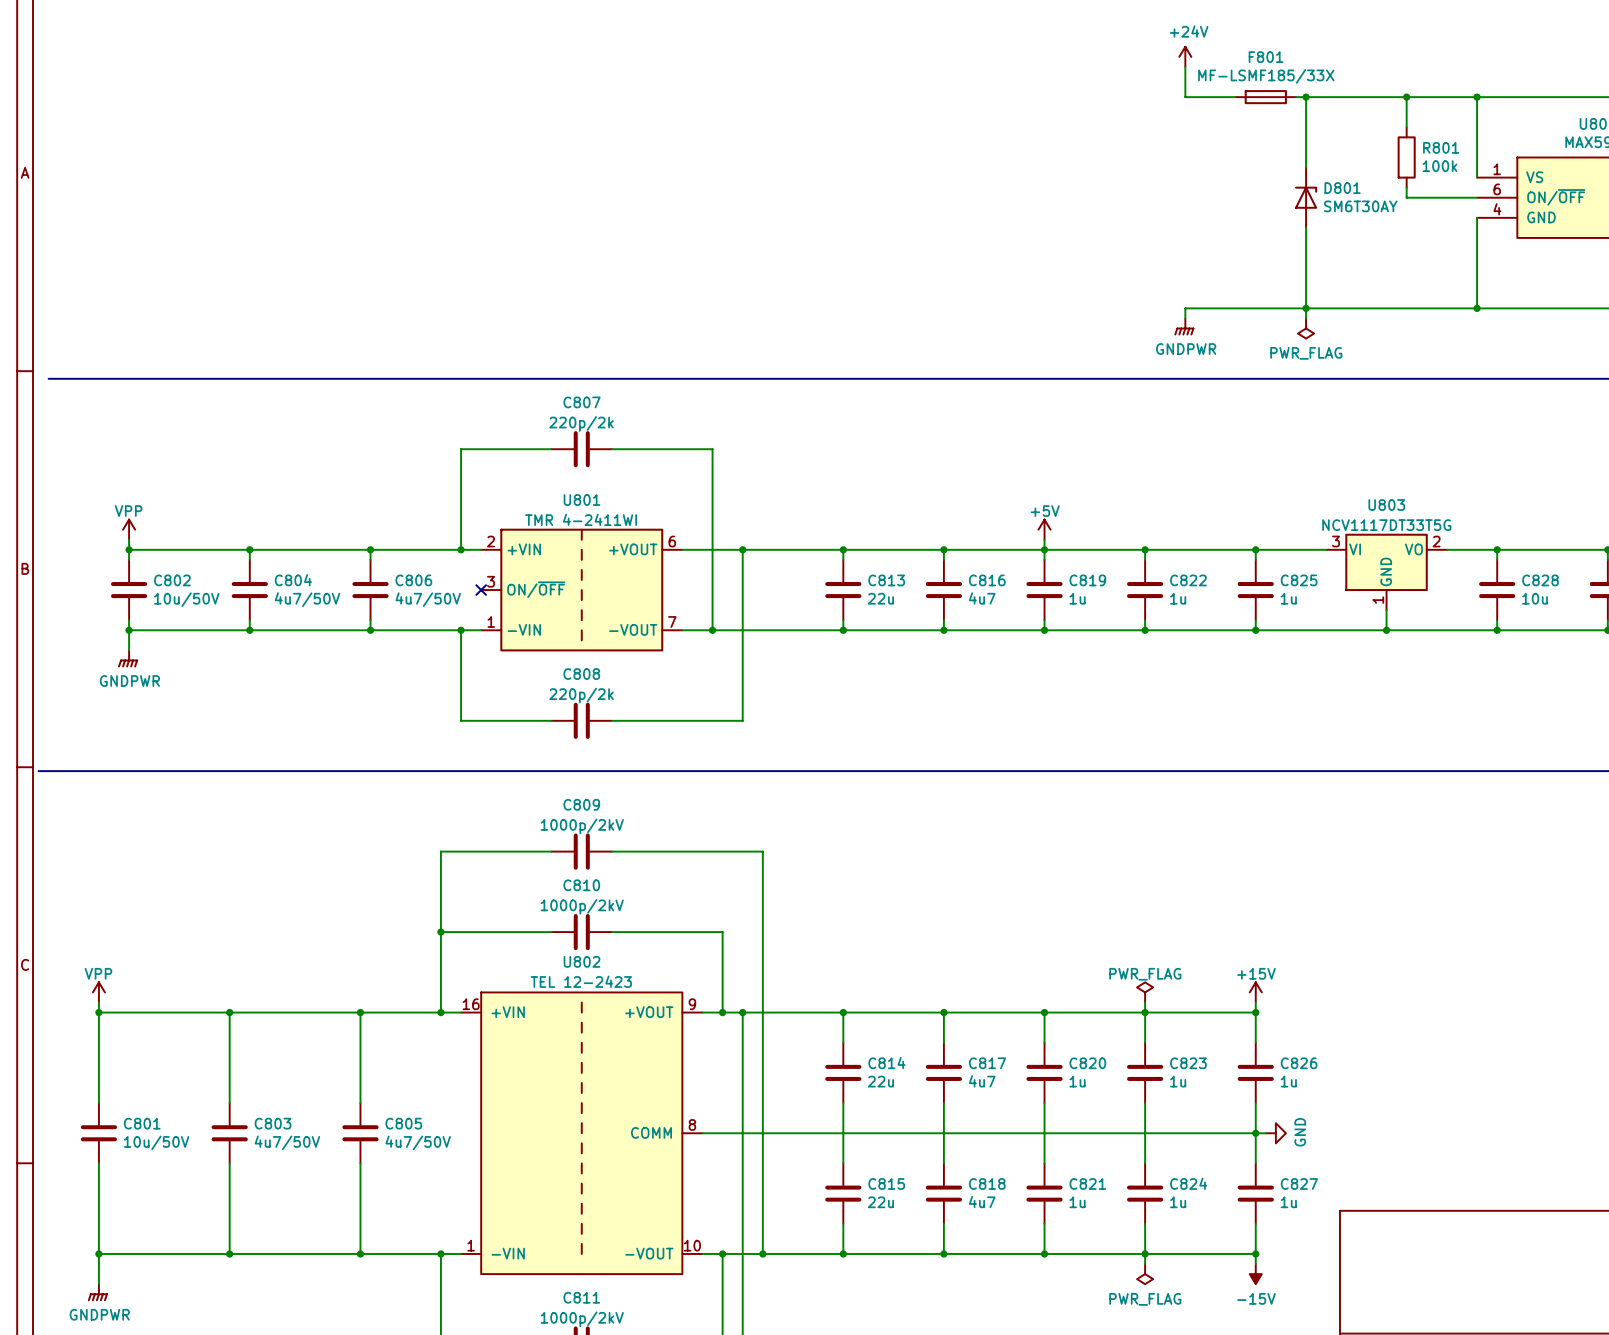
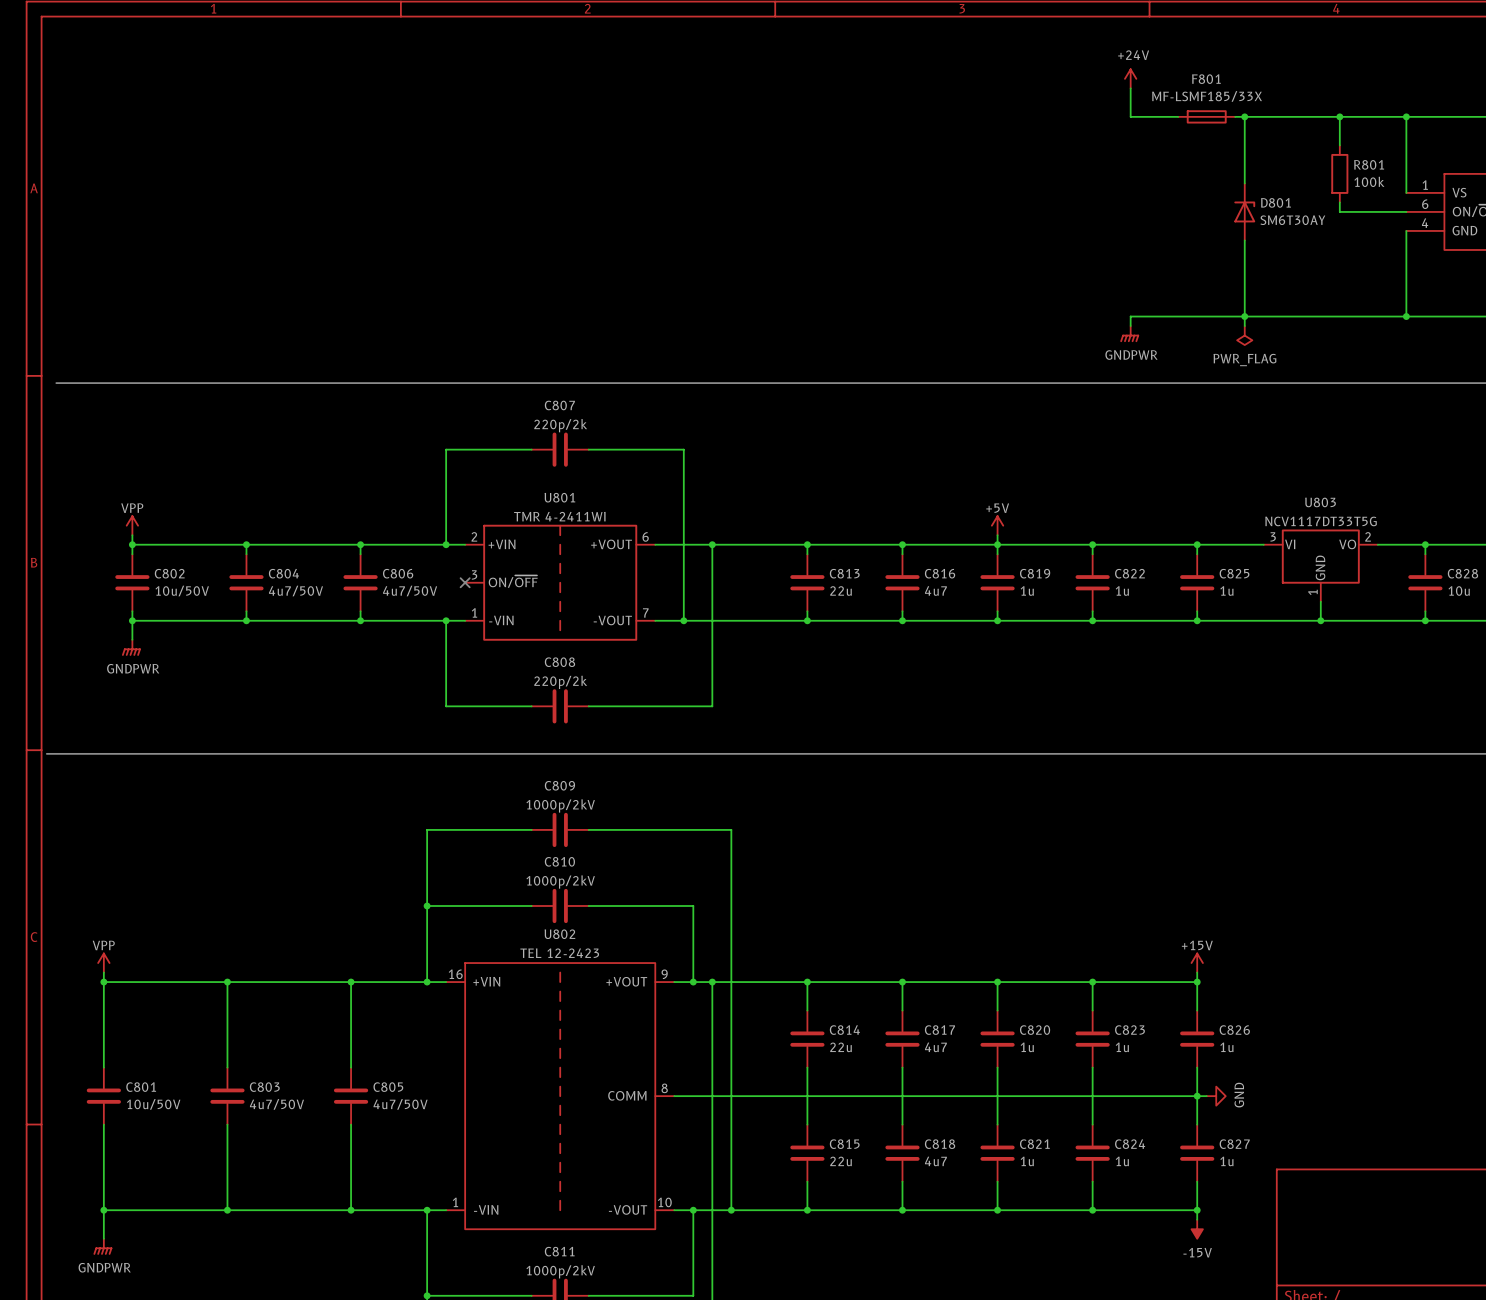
power symbol: PWR_FLAG (1145, 992) -> none
wire: (1145, 1002) (1145, 1012) -> none
wire: (1145, 1253) (1145, 1264) -> none
power symbol: PWR_FLAG (1145, 1274) -> none

